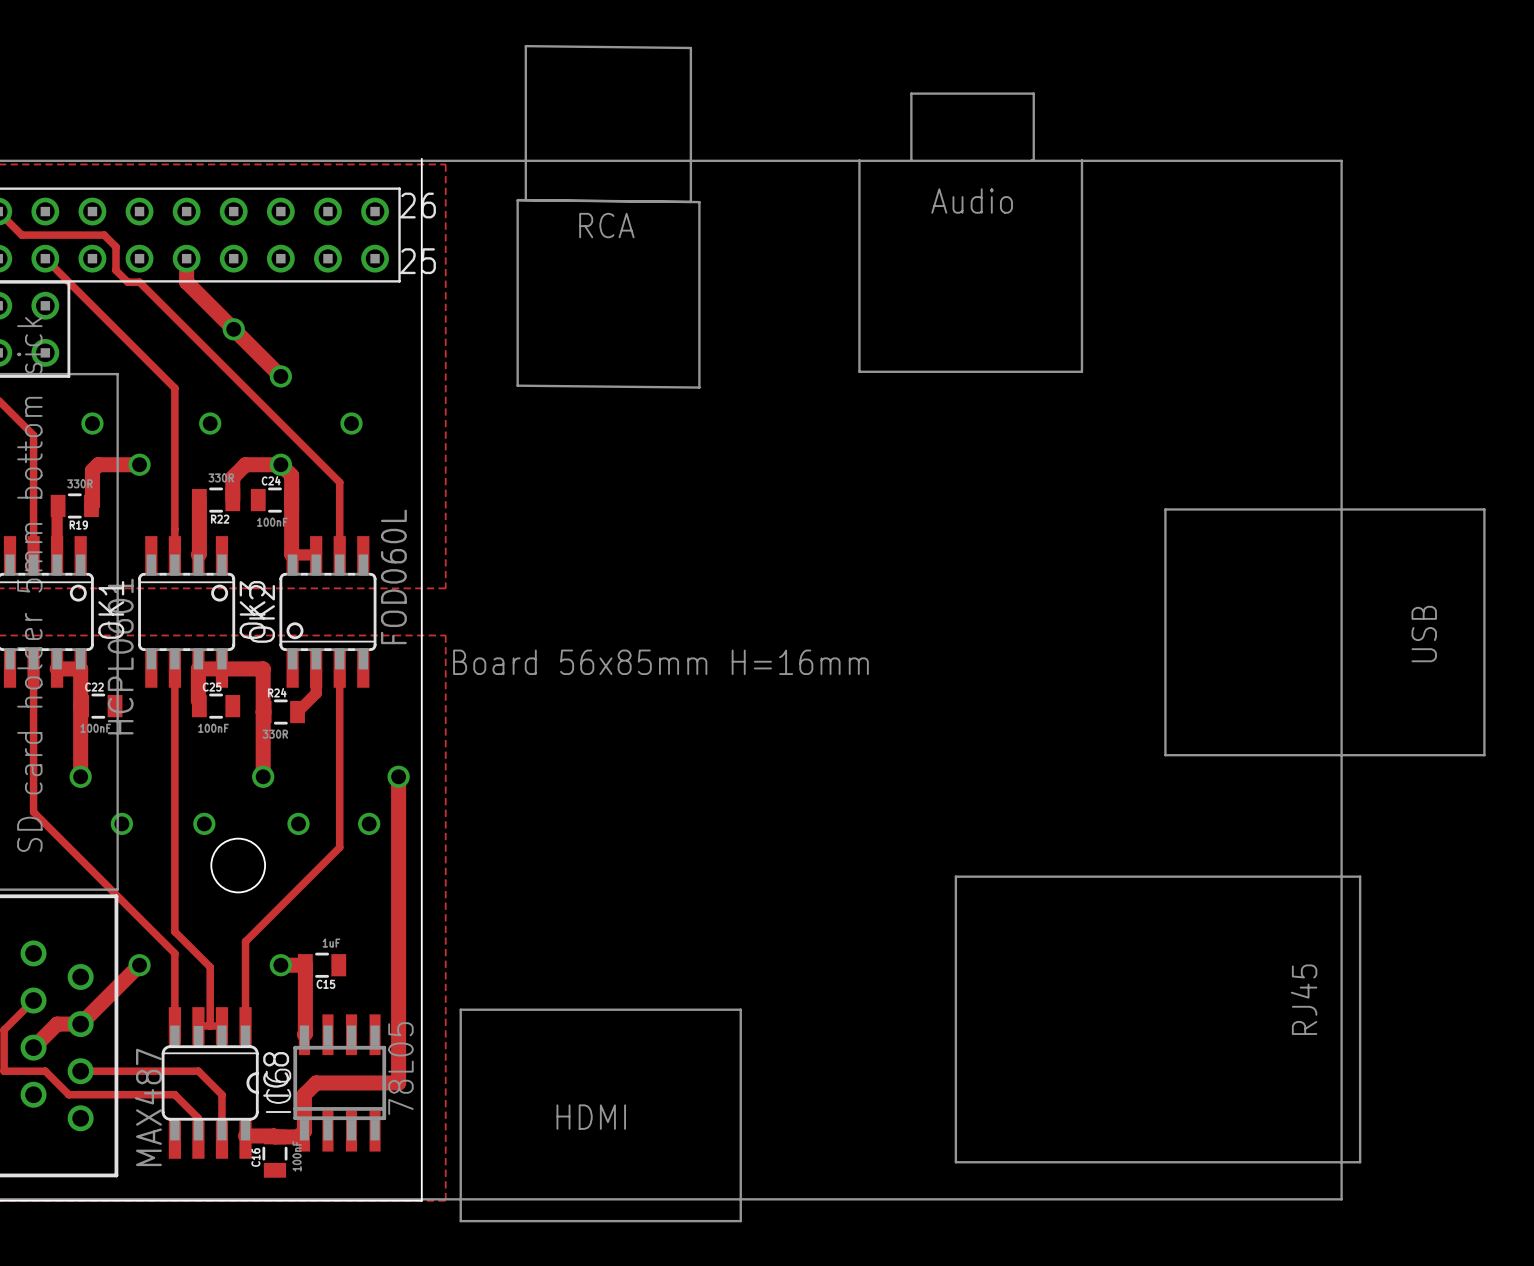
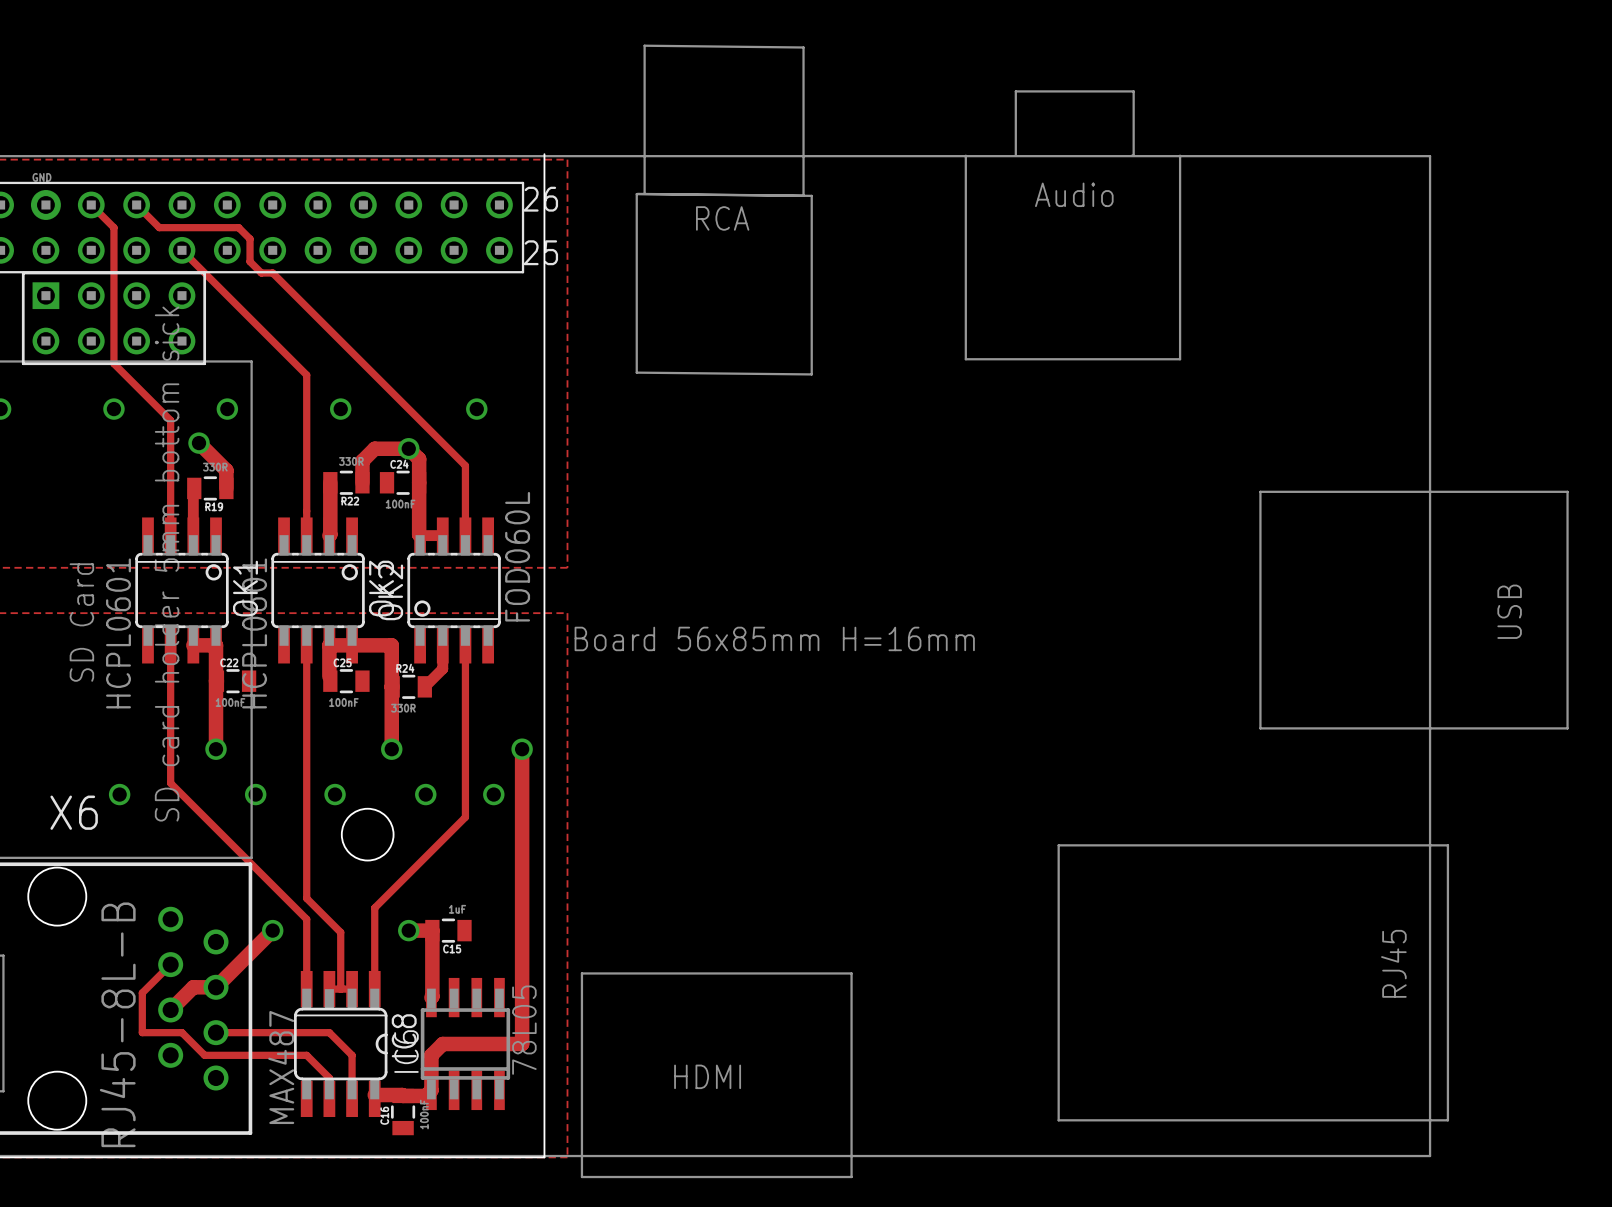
track: (186, 258) (186, 282) (280, 376) -> none
via: (233, 329) -> none
via: (280, 376) -> none
track: (139, 464) (98, 464) (92, 470) (91, 505) -> (199, 443) (226, 470) (226, 488)
via position: (139, 464) -> (199, 443)

